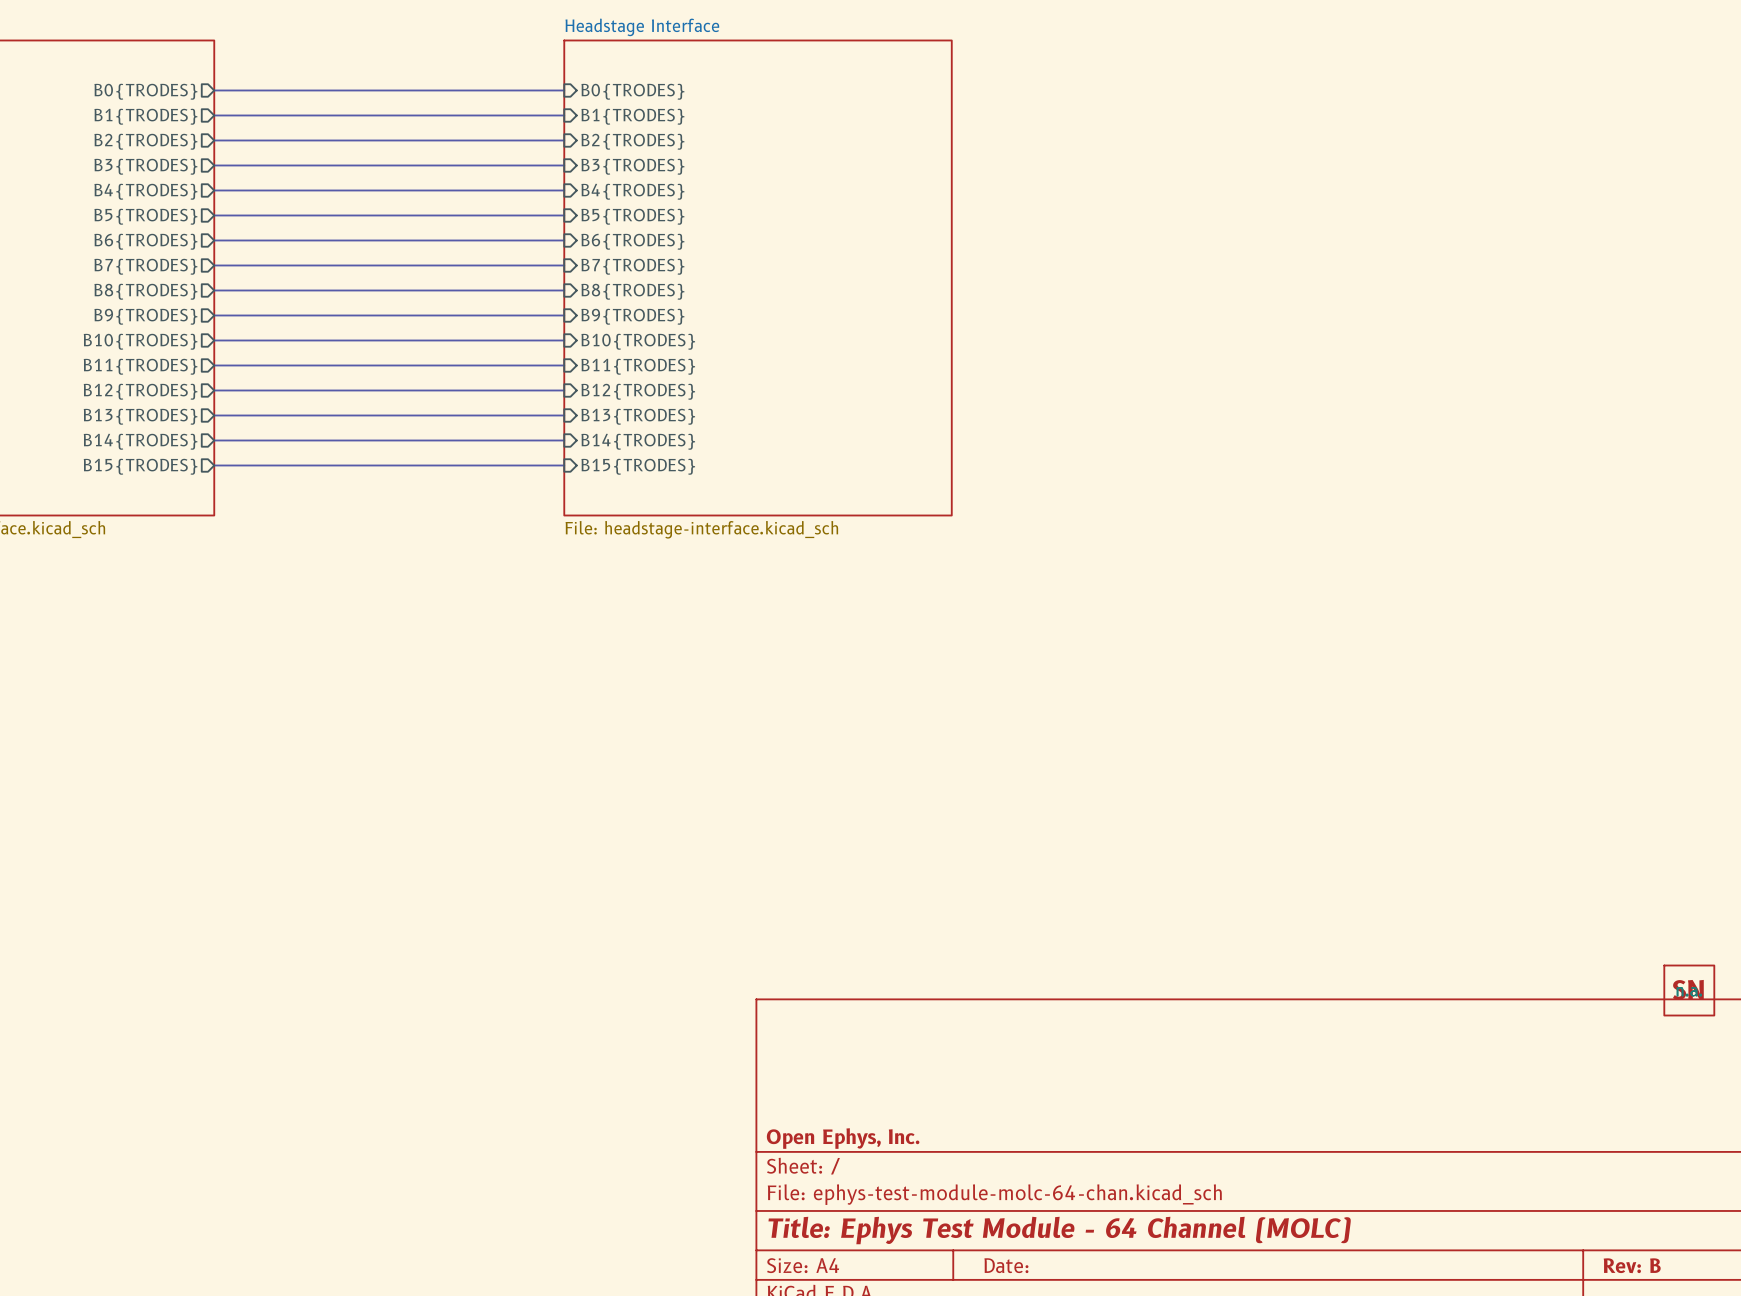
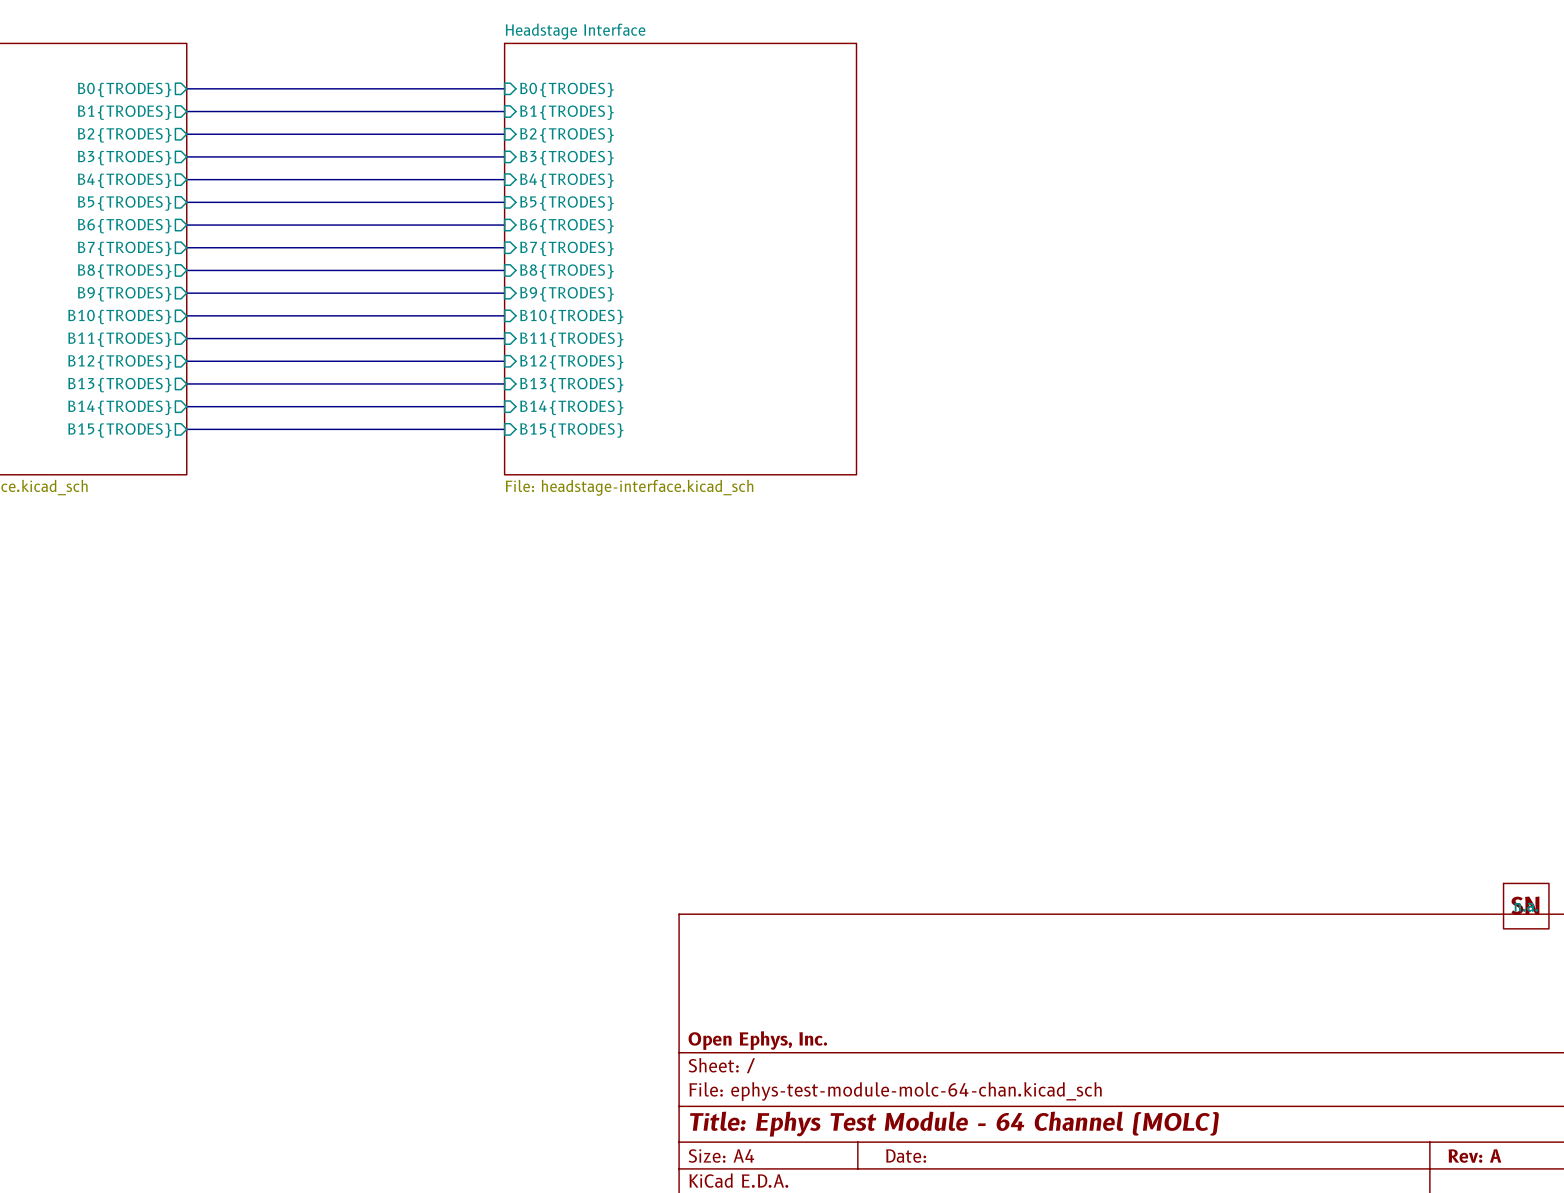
title block: Rev: B (1632, 1265) -> Rev: A (1474, 1156)

